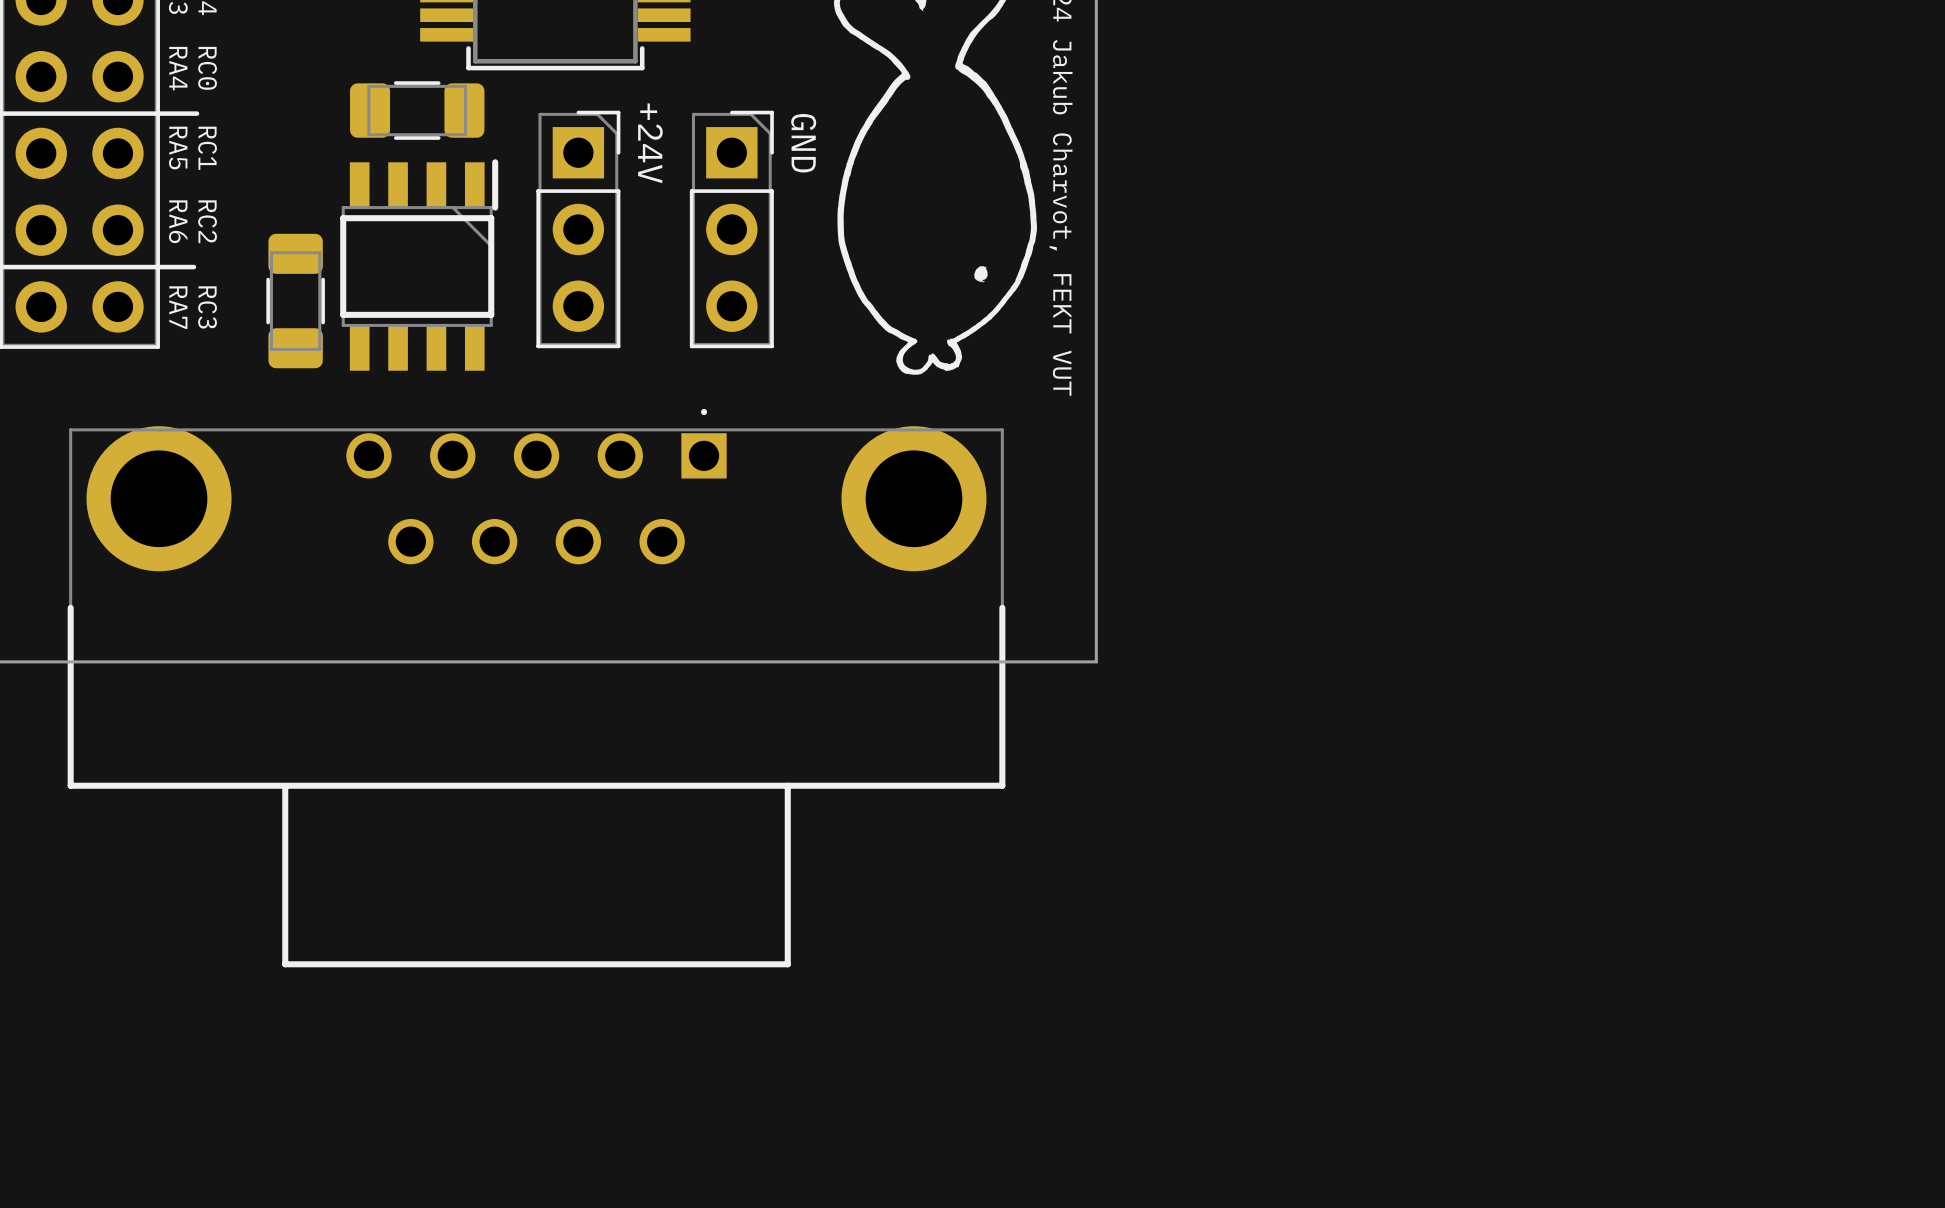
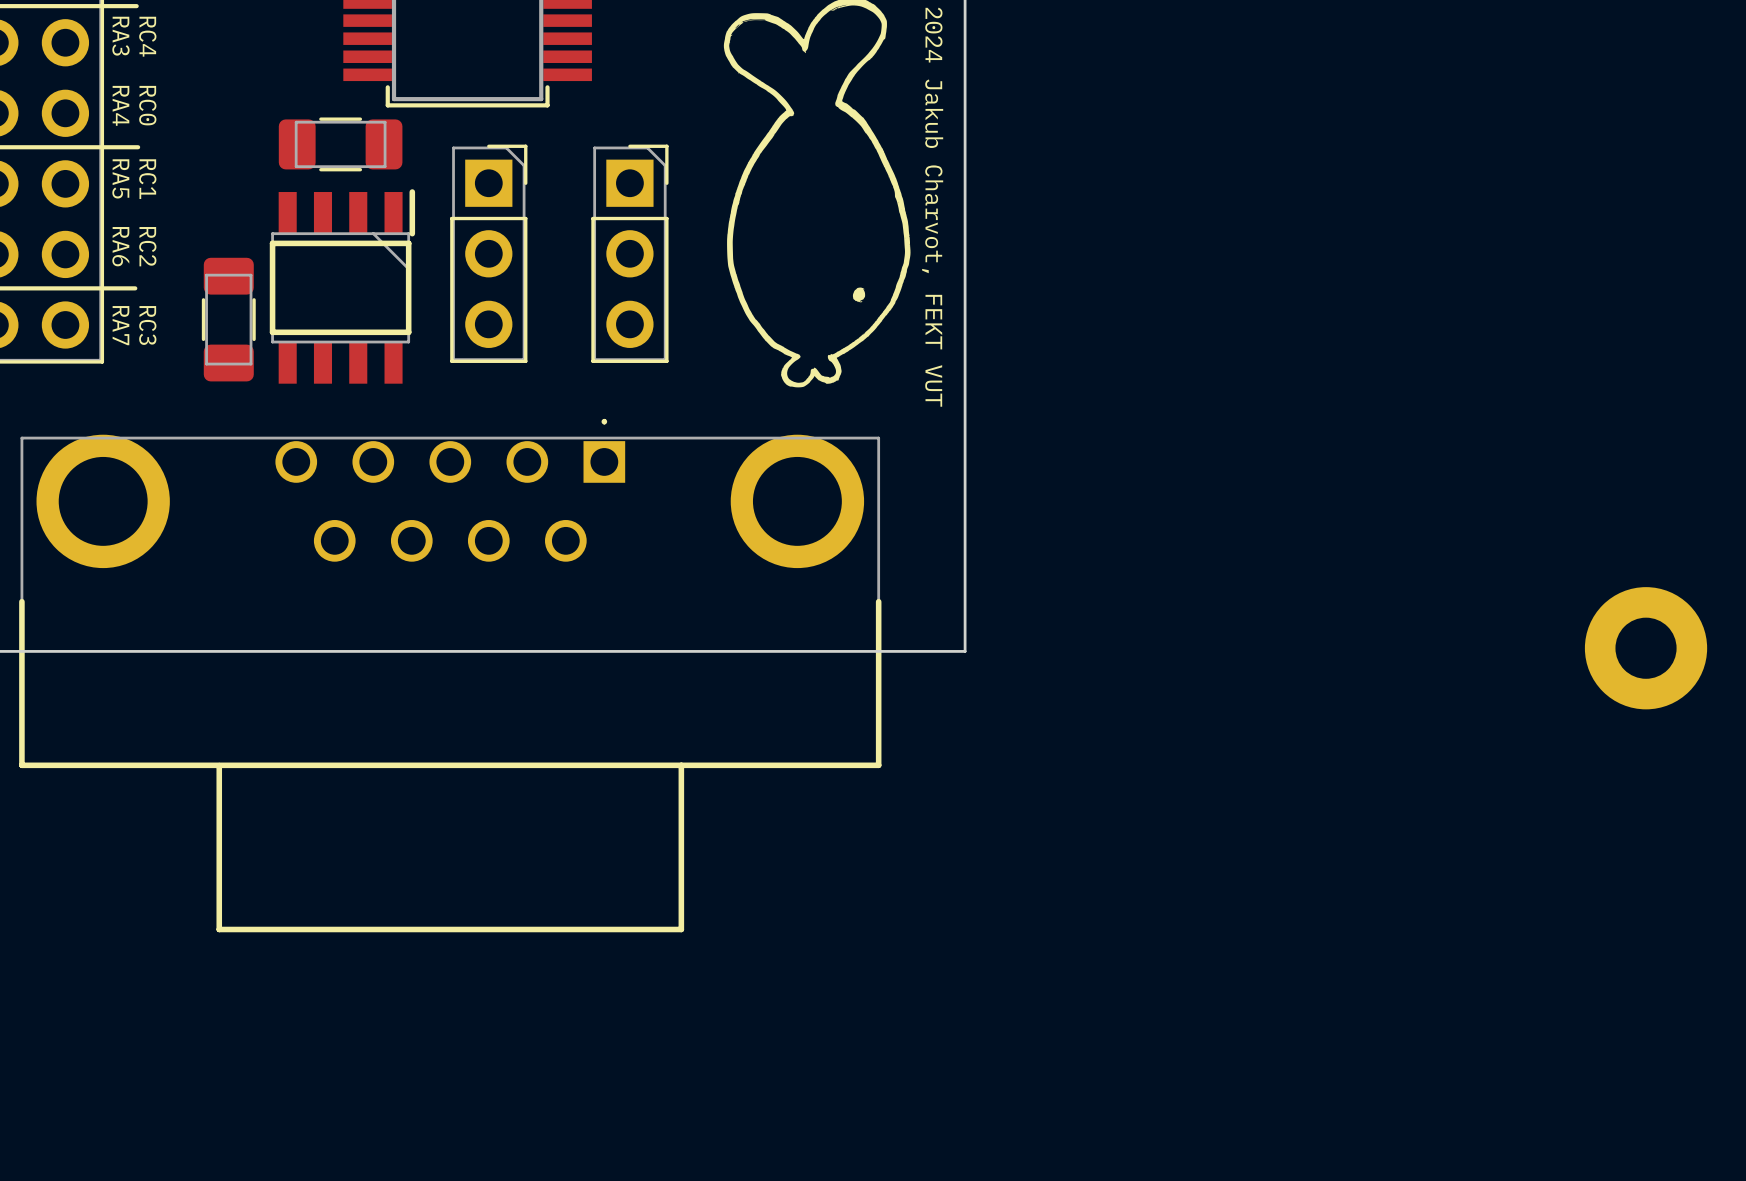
text: +24V (650, 143) -> none
text: GND (803, 143) -> none
part: none -> (1646, 648)

